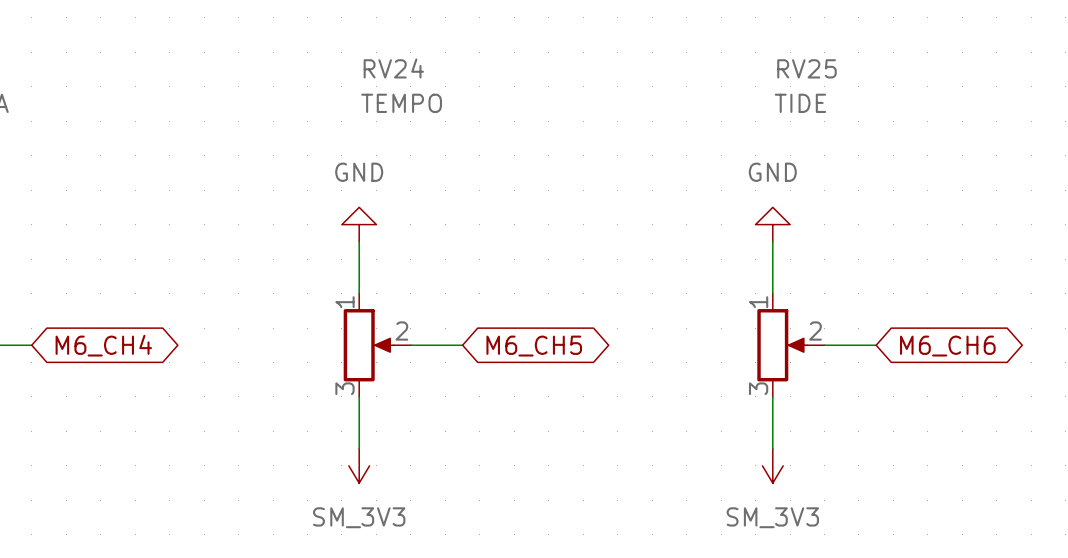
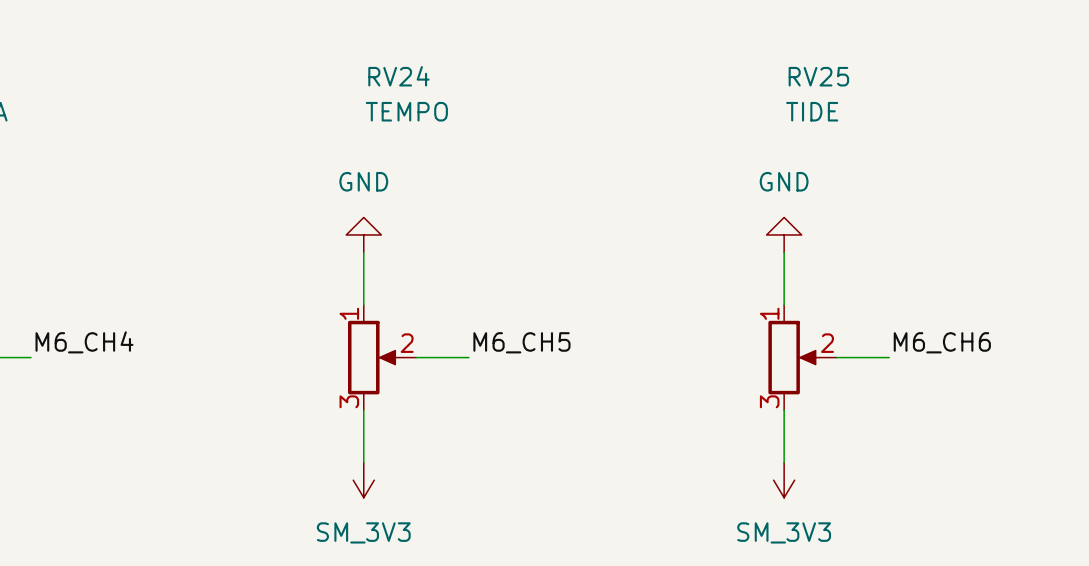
label: none -> M6_CH4 (84, 342)
label: none -> M6_CH5 (521, 342)
label: none -> M6_CH6 (942, 342)
global label: M6_CH4 (103, 345) -> none
global label: M6_CH5 (534, 346) -> none
global label: M6_CH6 (947, 346) -> none

